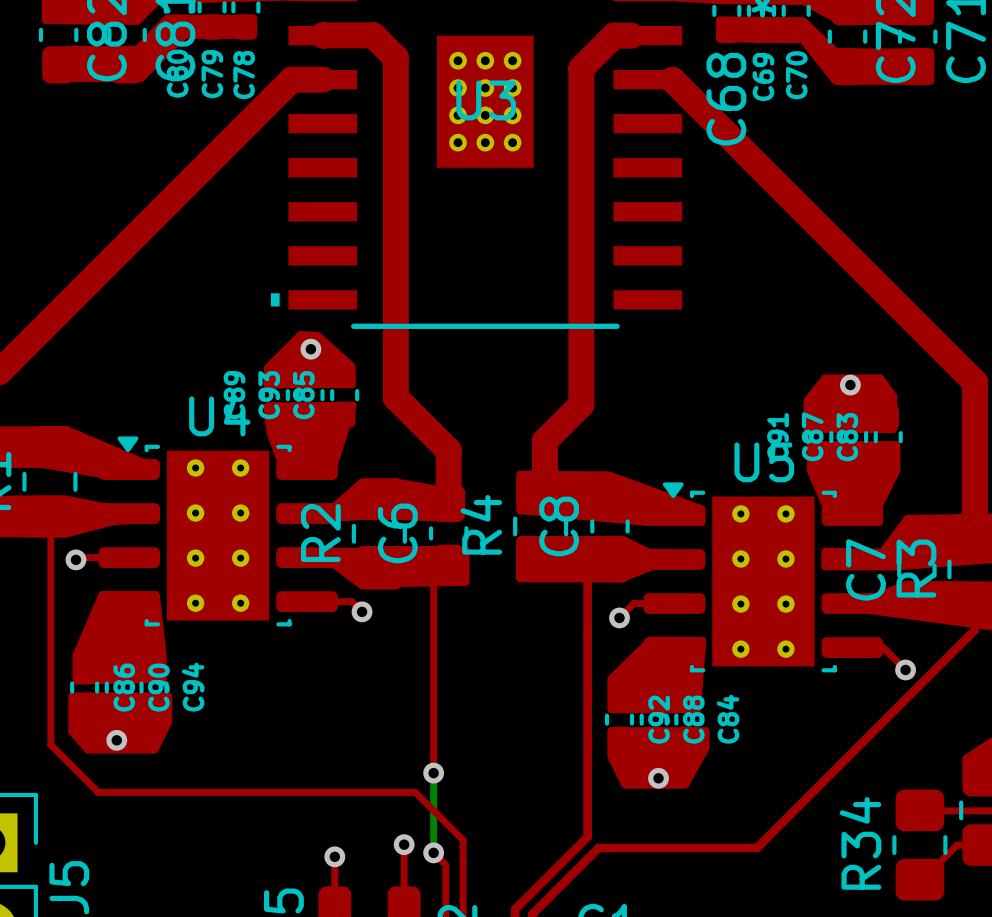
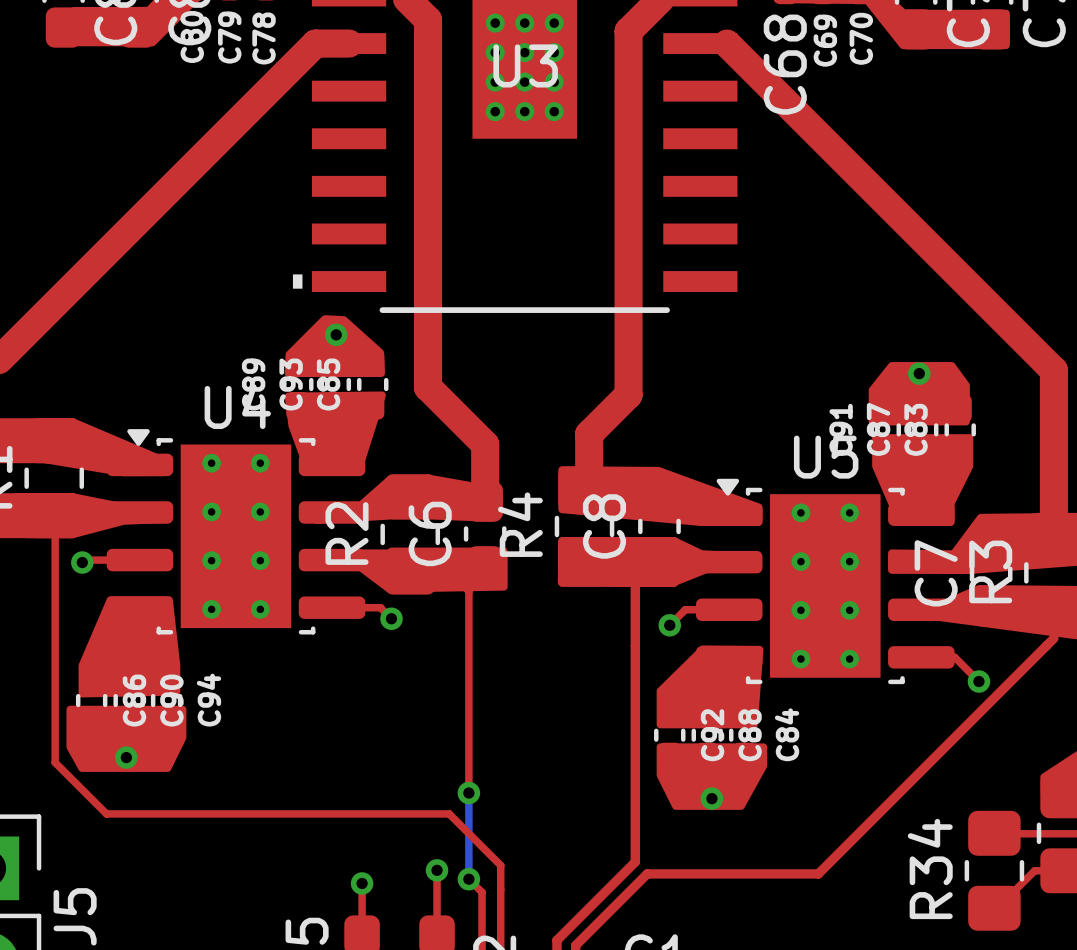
drawing shape: [68, 692, 173, 754] -> [66, 705, 187, 772]

